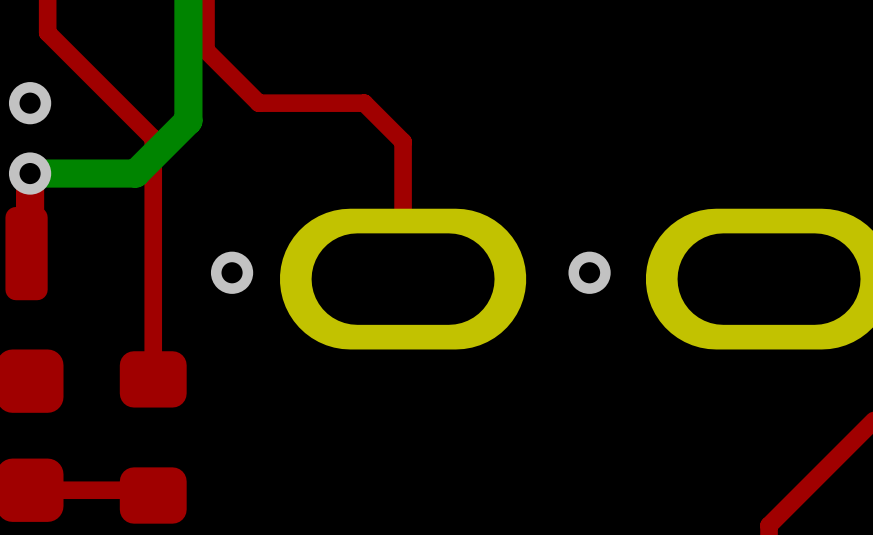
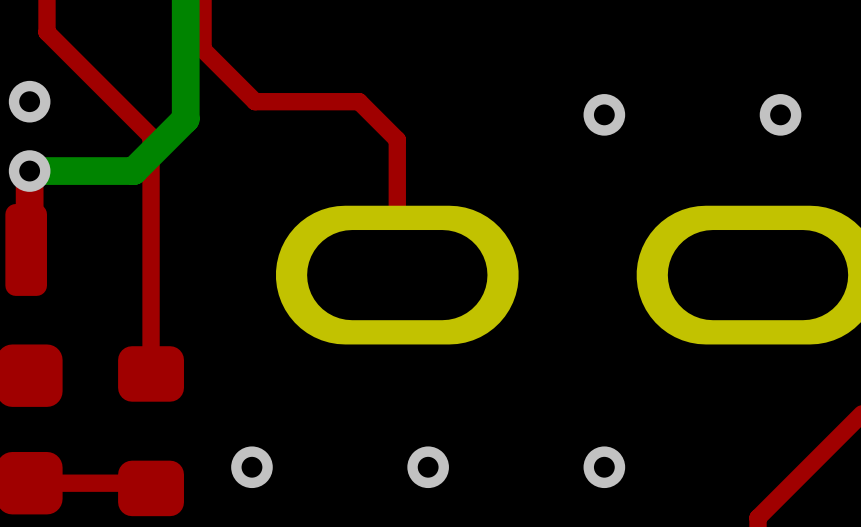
via: none -> (604, 114)
via: none -> (780, 114)
via: (232, 272) -> none
via: (589, 272) -> none
via: none -> (251, 467)
via: none -> (428, 467)
via: none -> (604, 467)

